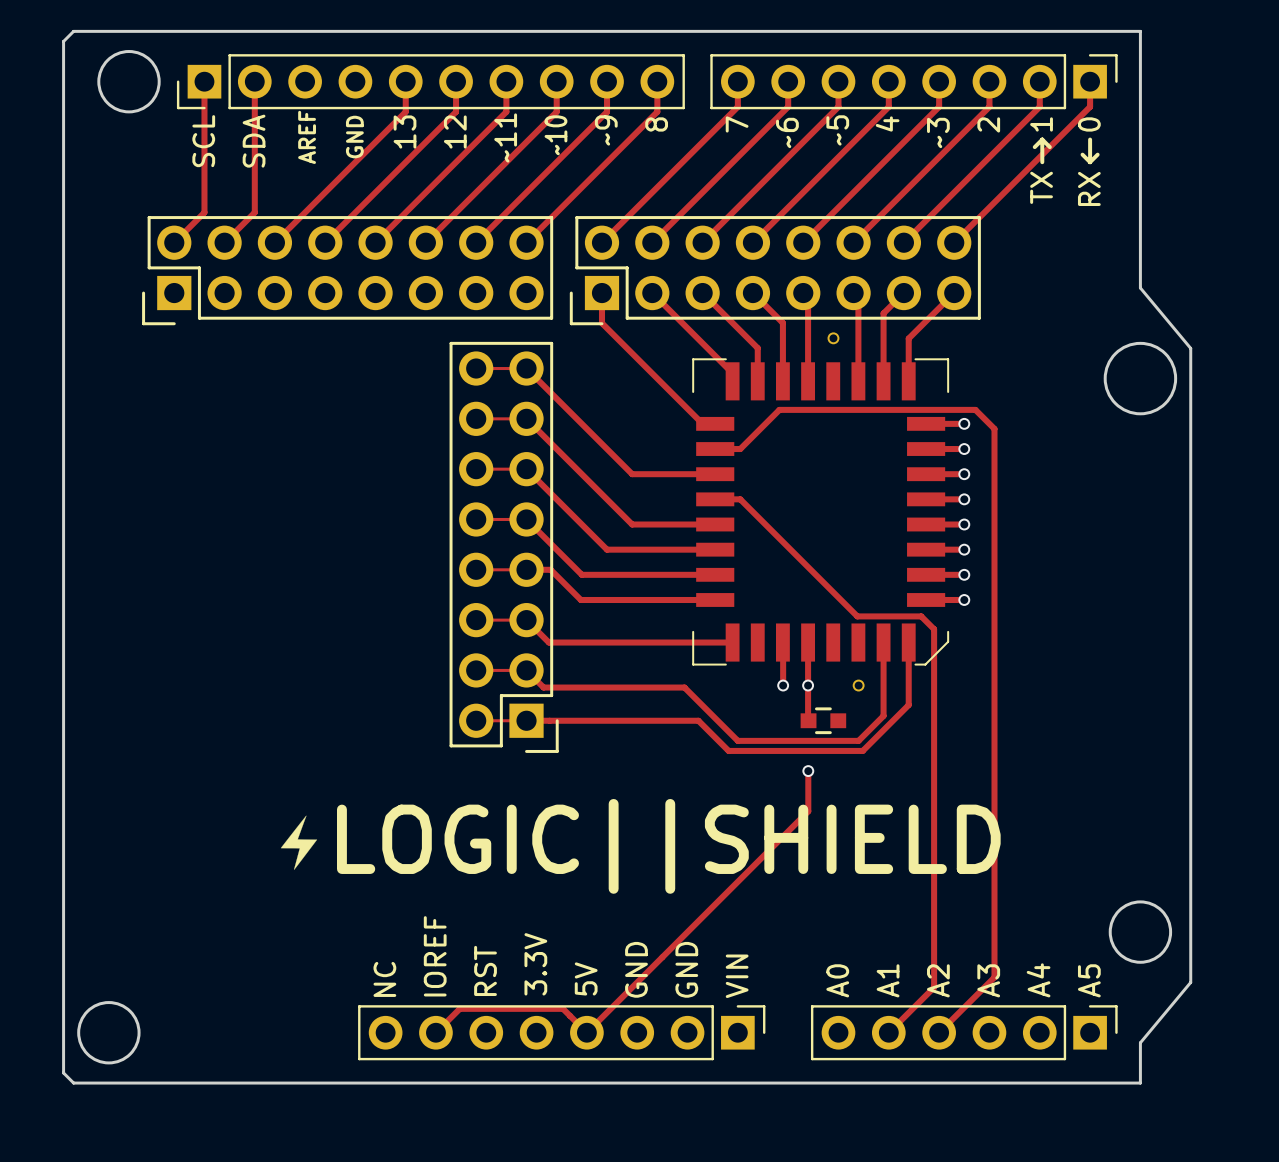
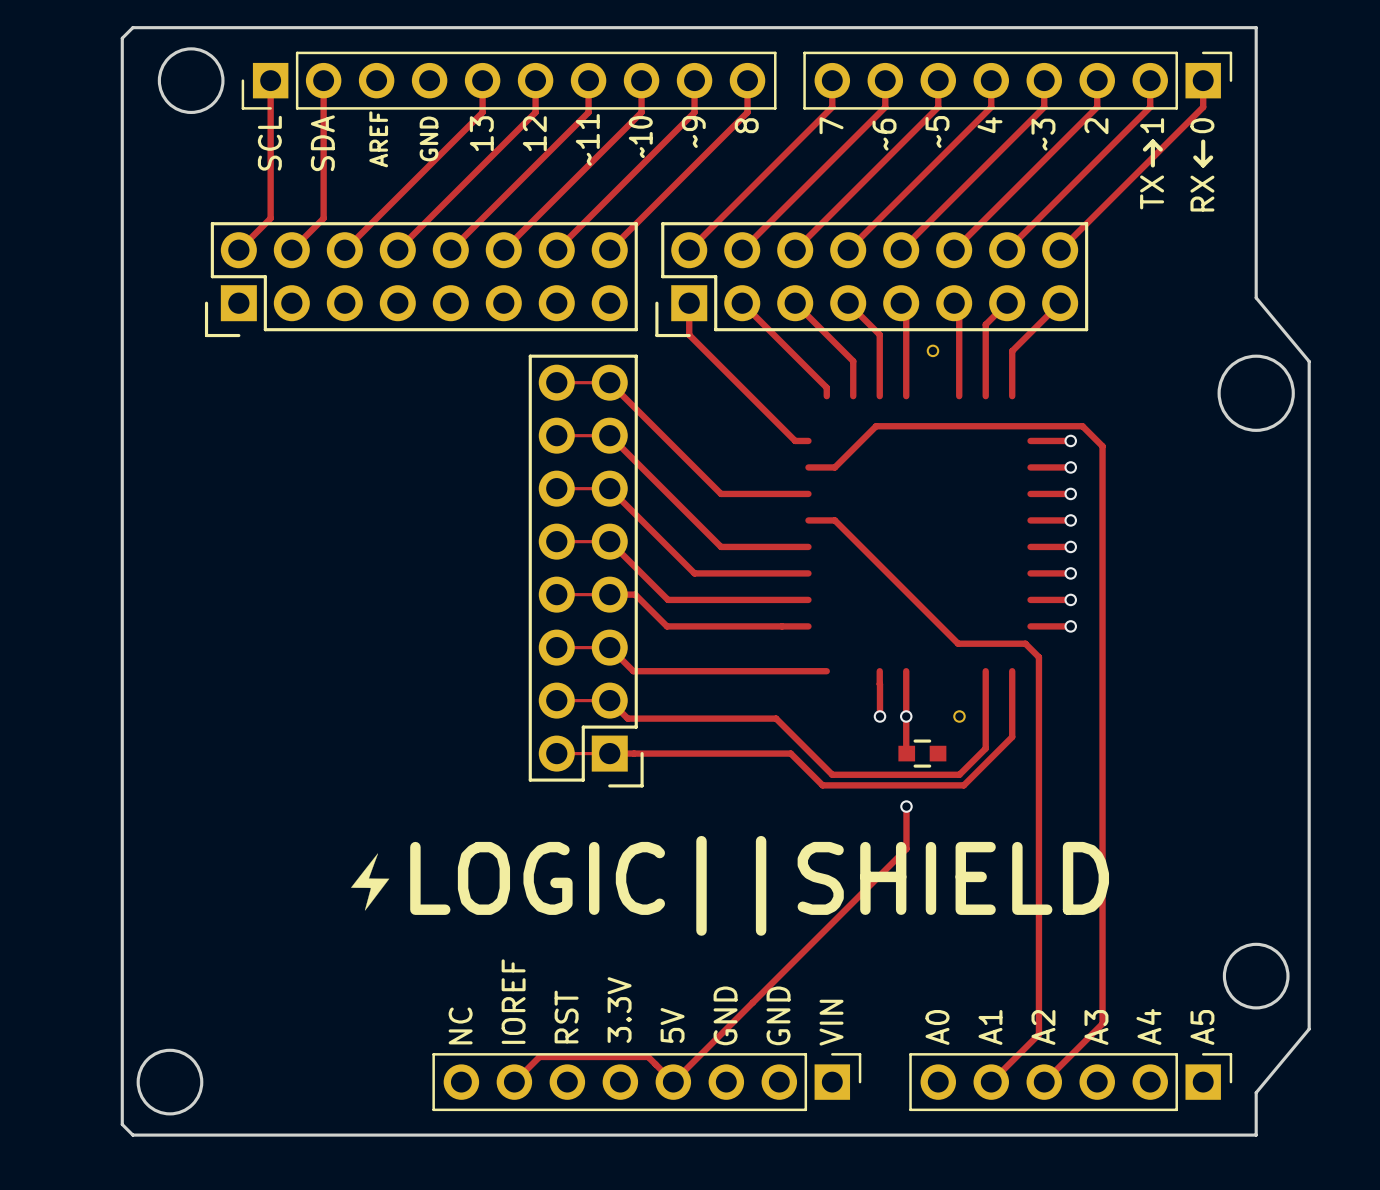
part: (820, 511) -> none

